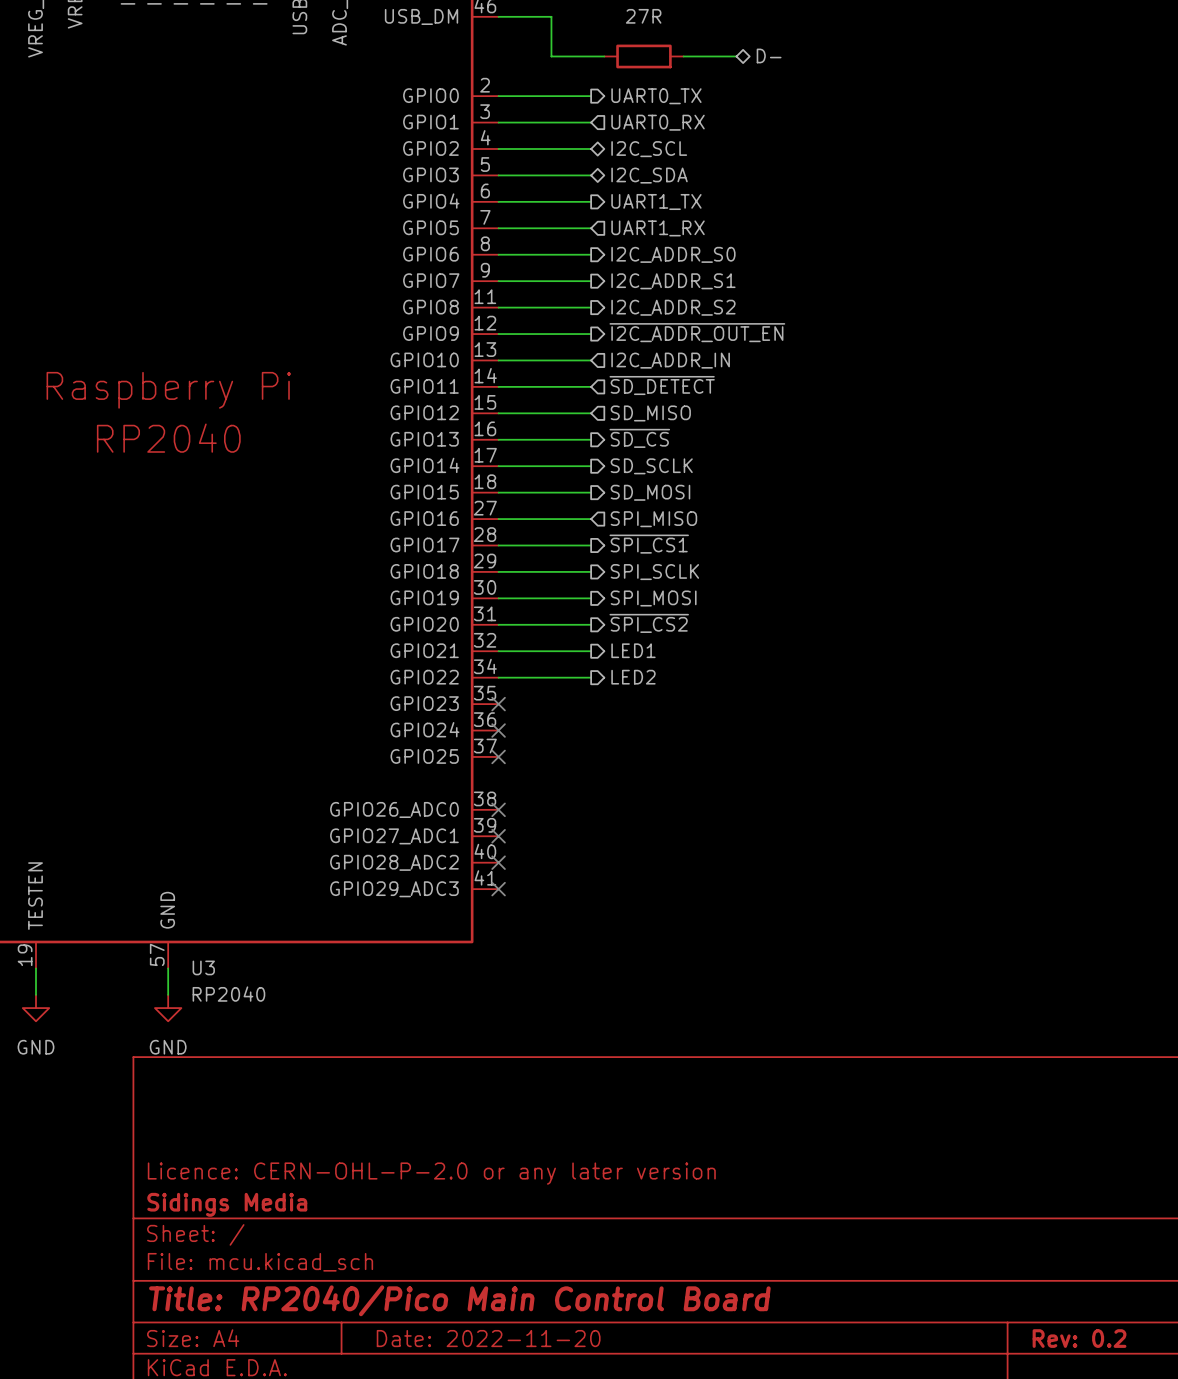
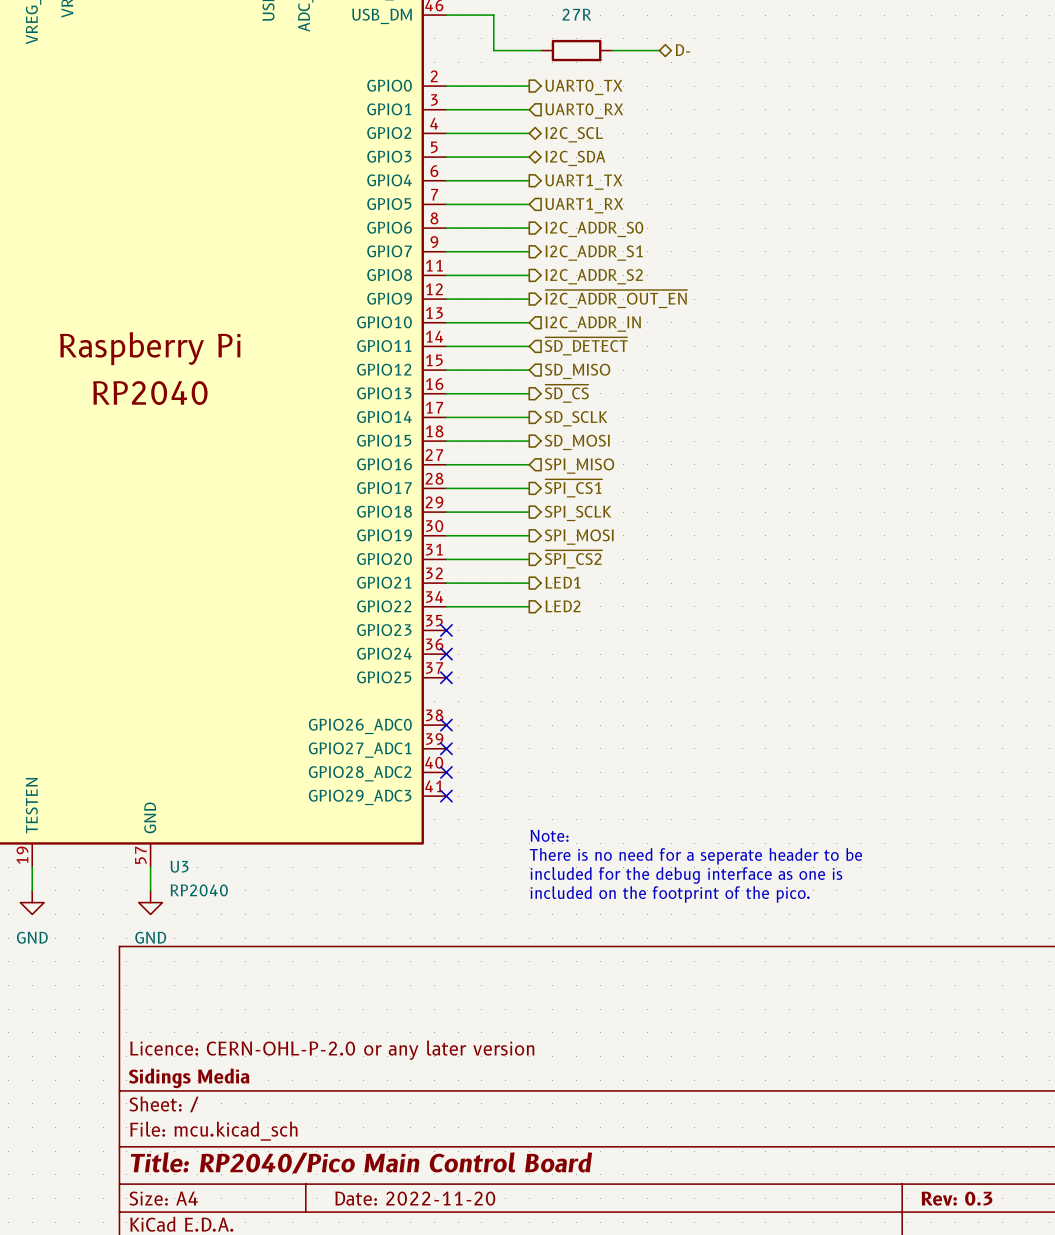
text: none -> Note: (549, 835)
text: none -> There is no need for a seperate header to be (695, 856)
text: none -> included for the debug interface as one is (686, 875)
text: none -> included on the footprint of the pico. (670, 894)
title block: Rev: 0.2 (1079, 1338) -> Rev: 0.3 (956, 1198)

